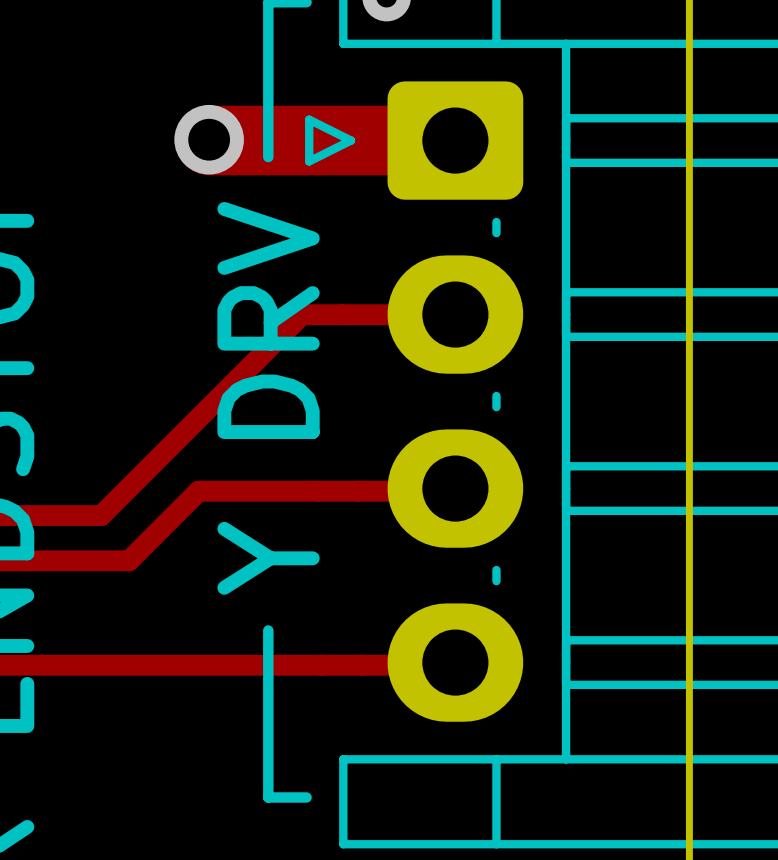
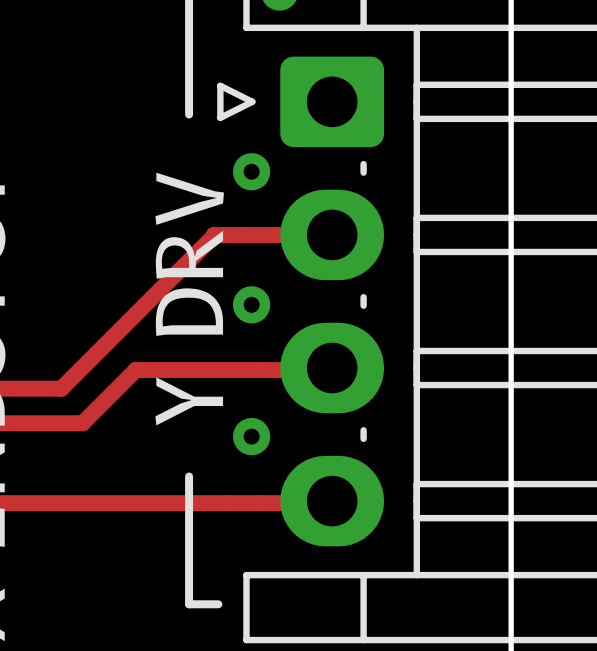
via: (209, 139) -> none
track: (209, 140) (455, 140) -> none
via: none -> (251, 171)
via: none -> (251, 304)
via: none -> (251, 436)

